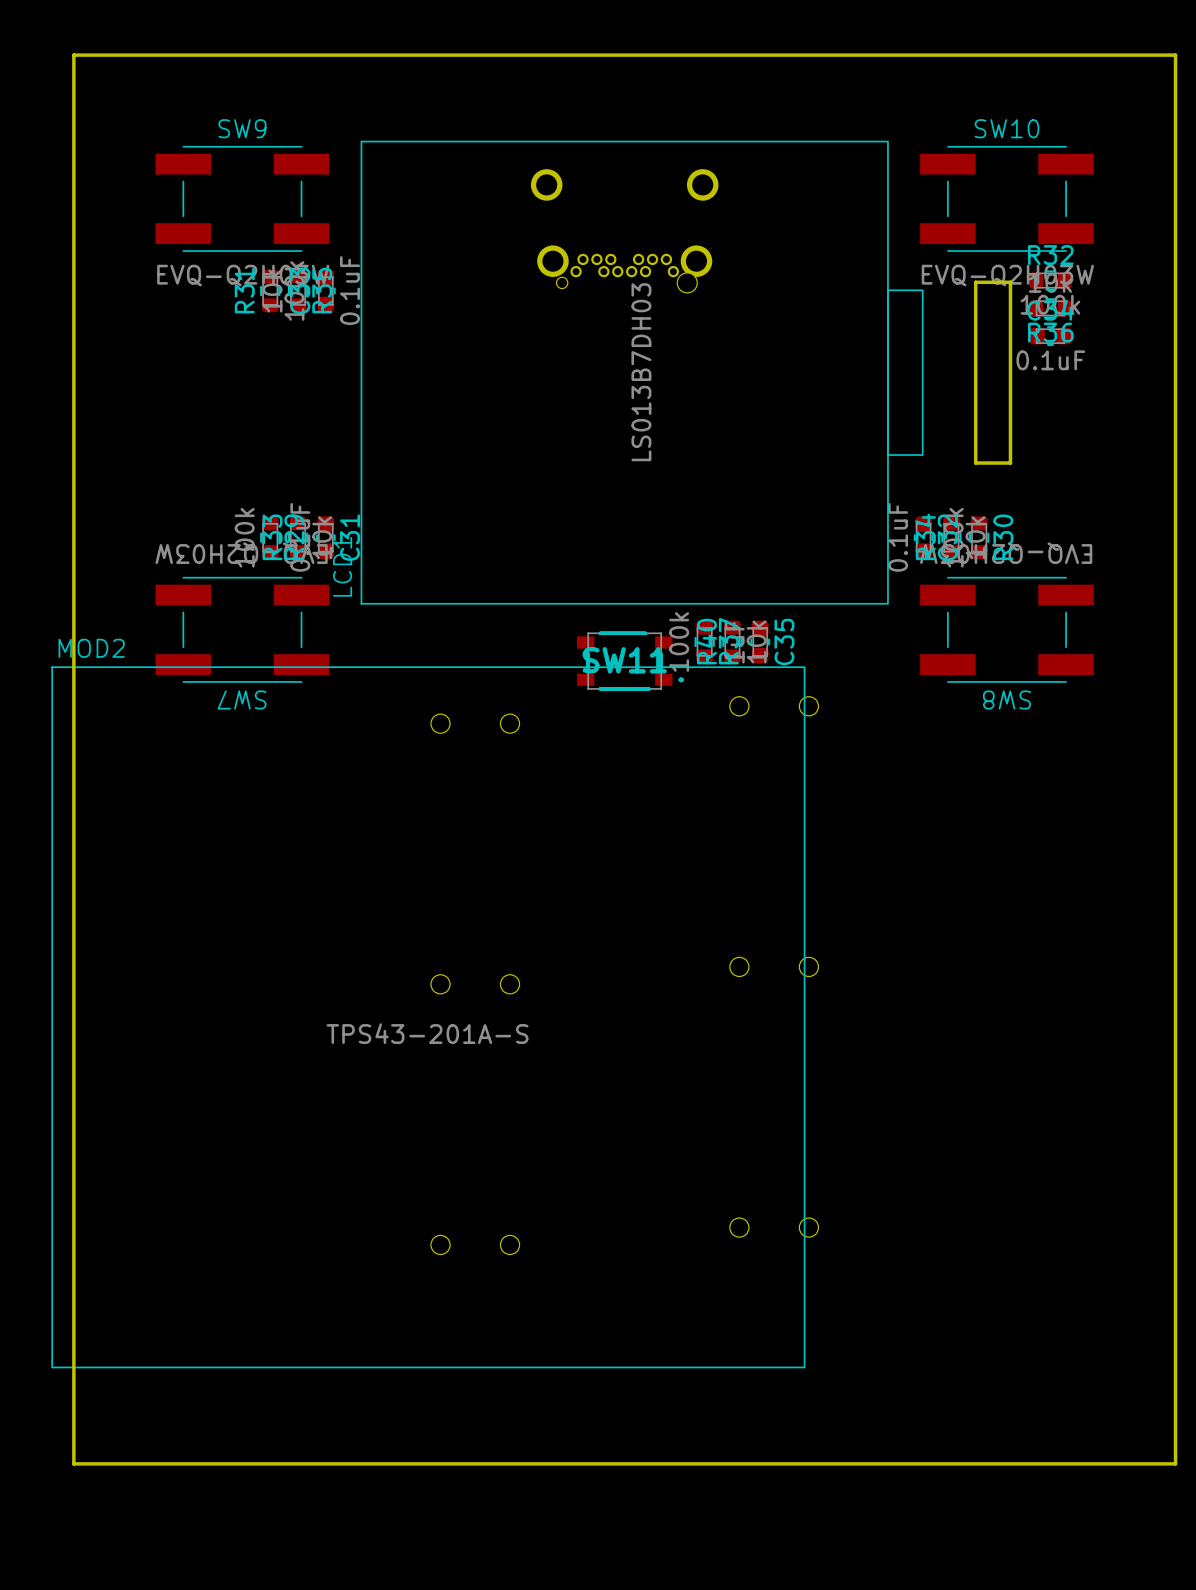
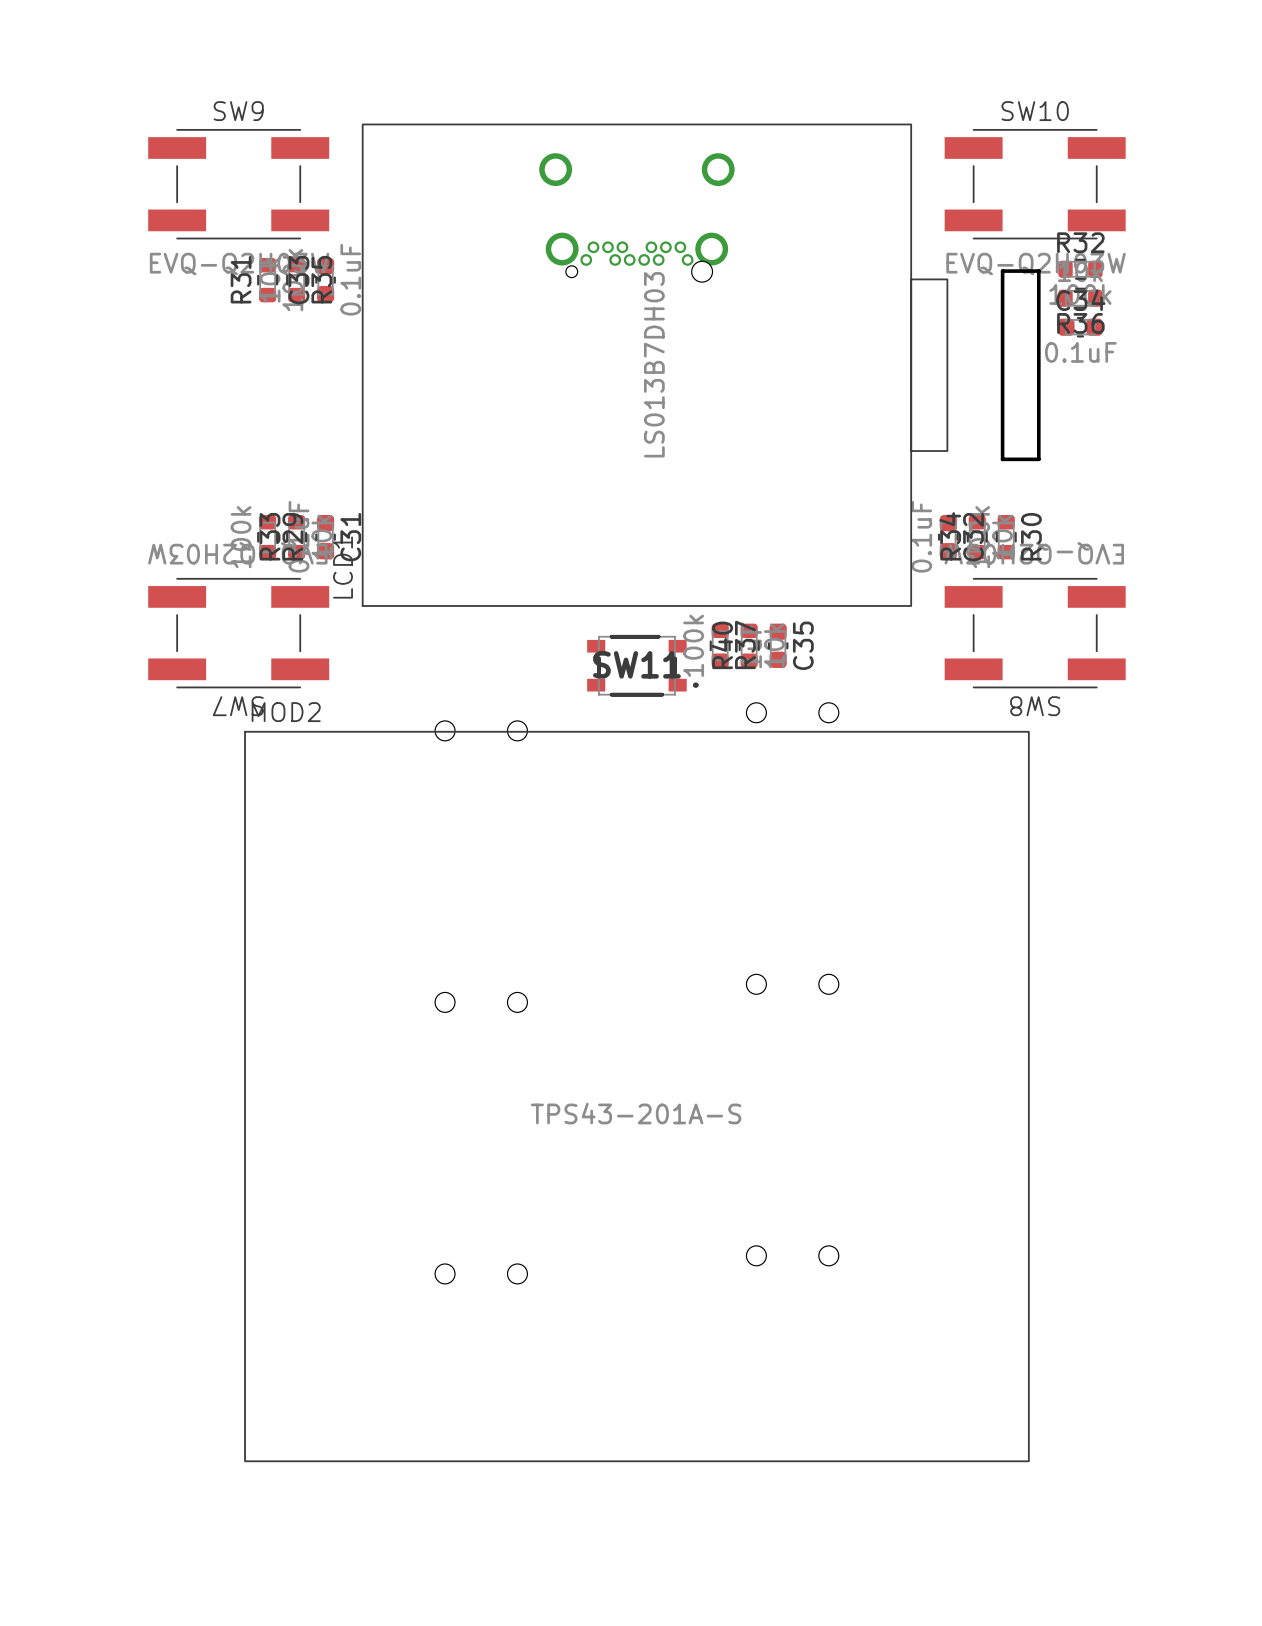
board edge: (73, 55) (1175, 55) (1175, 1463) (73, 1463) (73, 55) -> none
MOD2 position: (428, 1017) -> (636, 1096)

